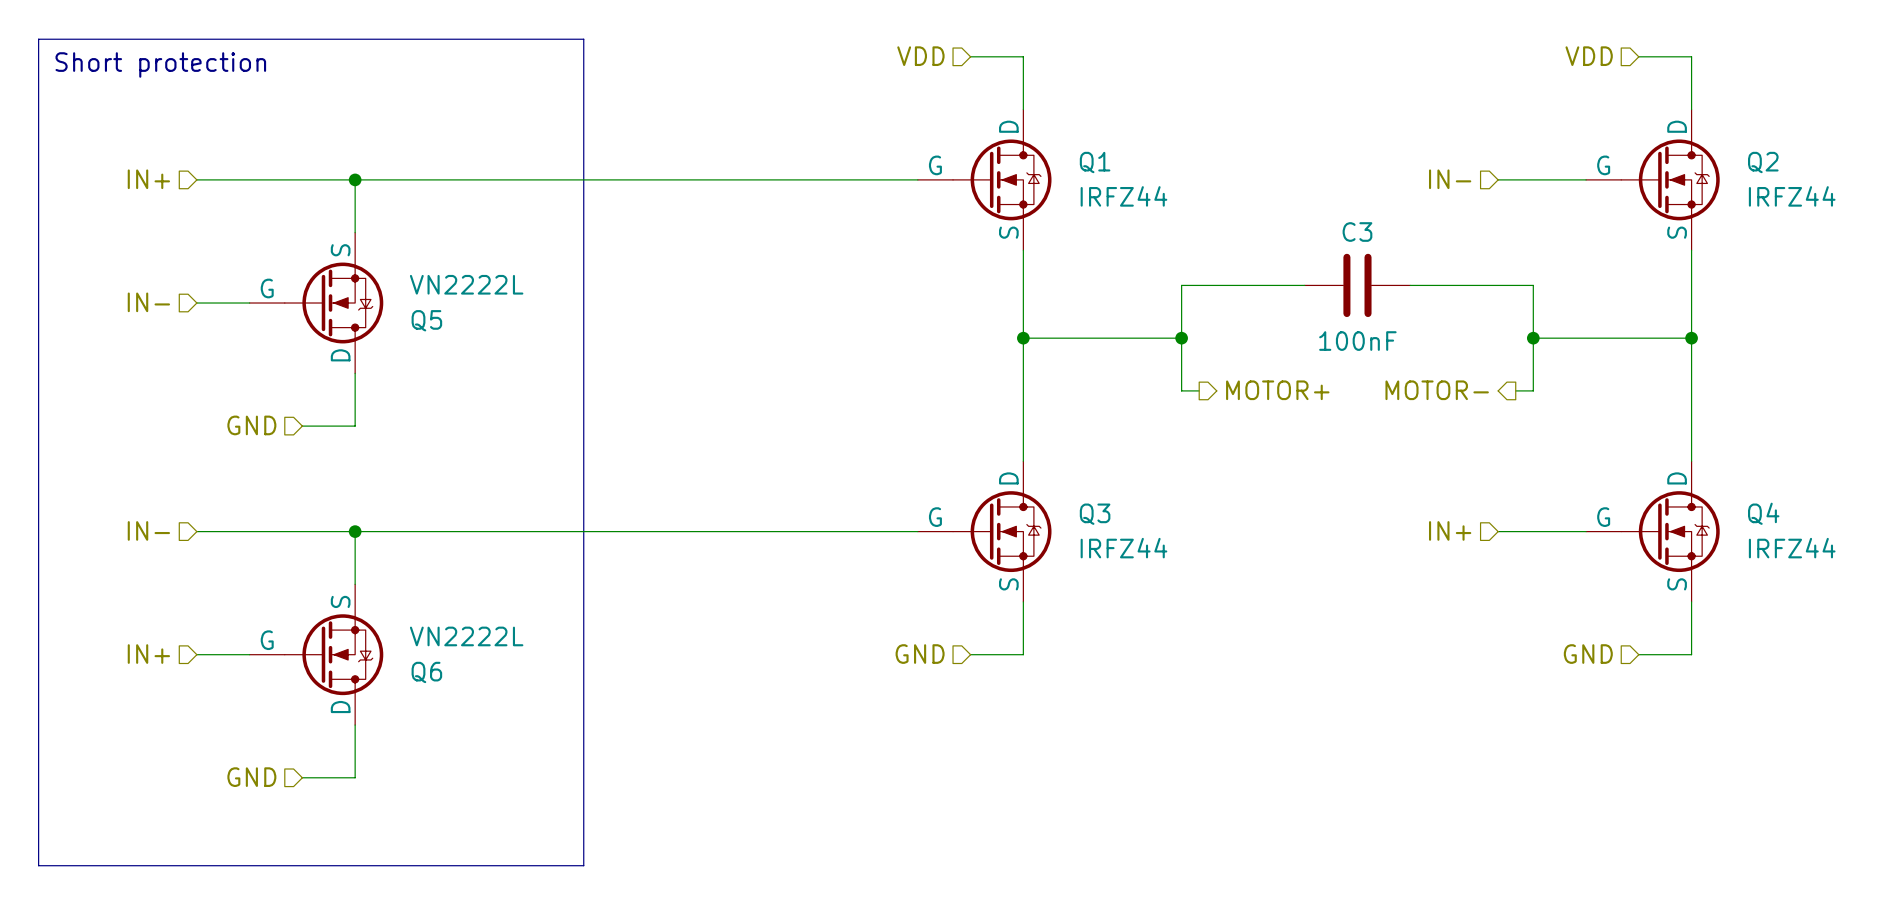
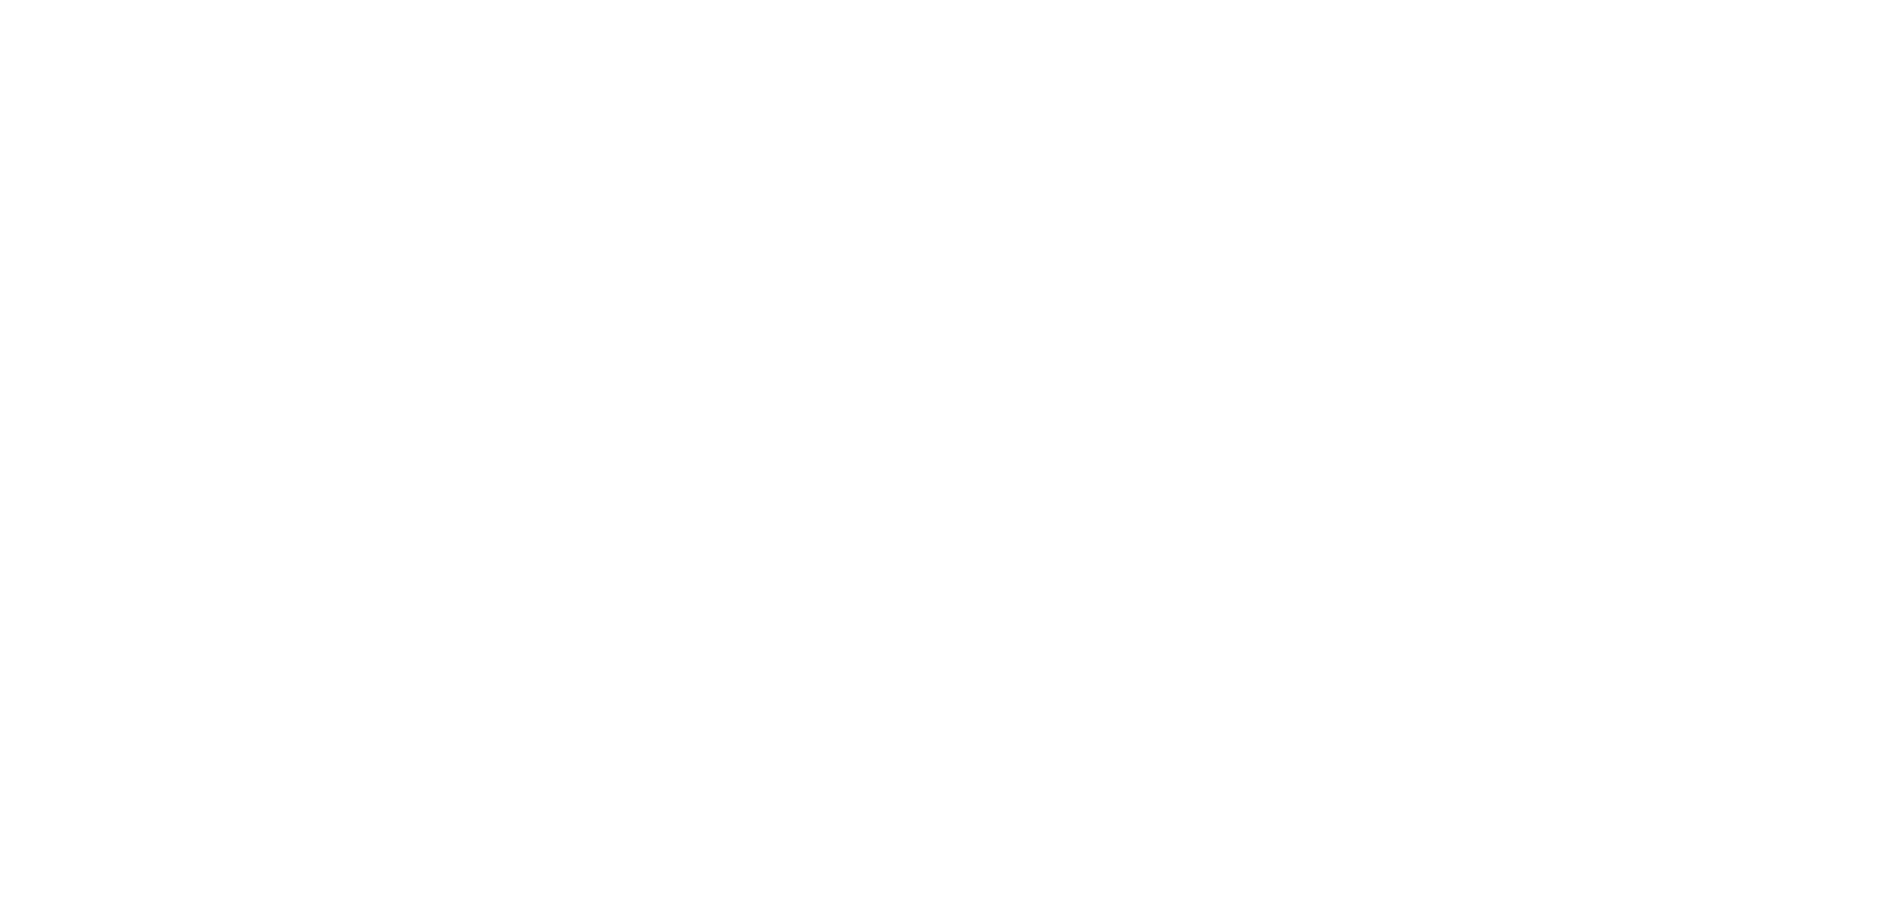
line: (38, 39) (583, 39) (583, 865) (38, 865) (38, 39) -> none
hierarchical label: VDD (920, 56) -> none
wire: (970, 56) (1023, 56) (1023, 109) -> none
hierarchical label: VDD (1589, 56) -> none
wire: (1638, 56) (1691, 56) (1691, 109) -> none
text: Short protection (160, 64) -> none
hierarchical label: IN+ (148, 179) -> none
wire: (196, 179) (917, 179) -> none
wire: (355, 179) (355, 232) -> none
junction: (355, 179) -> none
Q1: IRFZ44 (984, 179) -> none
hierarchical label: IN- (1450, 179) -> none
wire: (1498, 179) (1586, 179) -> none
Q2: IRFZ44 (1652, 179) -> none
wire: (1023, 250) (1023, 461) -> none
wire: (1691, 250) (1691, 461) -> none
wire: (1304, 285) (1181, 285) (1181, 390) (1199, 390) -> none
C3: 100nF (1357, 285) -> none
wire: (1410, 285) (1533, 285) (1533, 390) (1515, 390) -> none
hierarchical label: IN- (148, 302) -> none
wire: (196, 303) (249, 303) -> none
Q5: VN2222L (316, 303) -> none
wire: (1023, 338) (1181, 338) -> none
junction: (1023, 338) -> none
junction: (1181, 338) -> none
wire: (1533, 338) (1691, 338) -> none
junction: (1533, 338) -> none
junction: (1691, 338) -> none
wire: (355, 373) (355, 426) (302, 426) -> none
hierarchical label: MOTOR+ (1277, 390) -> none
hierarchical label: MOTOR- (1437, 390) -> none
hierarchical label: GND (251, 425) -> none
hierarchical label: IN- (148, 530) -> none
hierarchical label: IN+ (1450, 530) -> none
wire: (196, 531) (917, 531) -> none
wire: (355, 531) (355, 584) -> none
junction: (355, 531) -> none
Q3: IRFZ44 (984, 531) -> none
wire: (1498, 531) (1586, 531) -> none
Q4: IRFZ44 (1652, 531) -> none
wire: (1023, 601) (1023, 654) (970, 654) -> none
wire: (1691, 601) (1691, 654) (1638, 654) -> none
hierarchical label: IN+ (148, 654) -> none
wire: (196, 654) (249, 654) -> none
Q6: VN2222L (316, 654) -> none
hierarchical label: GND (920, 654) -> none
hierarchical label: GND (1588, 654) -> none
wire: (355, 725) (355, 777) (302, 777) -> none
hierarchical label: GND (251, 777) -> none

